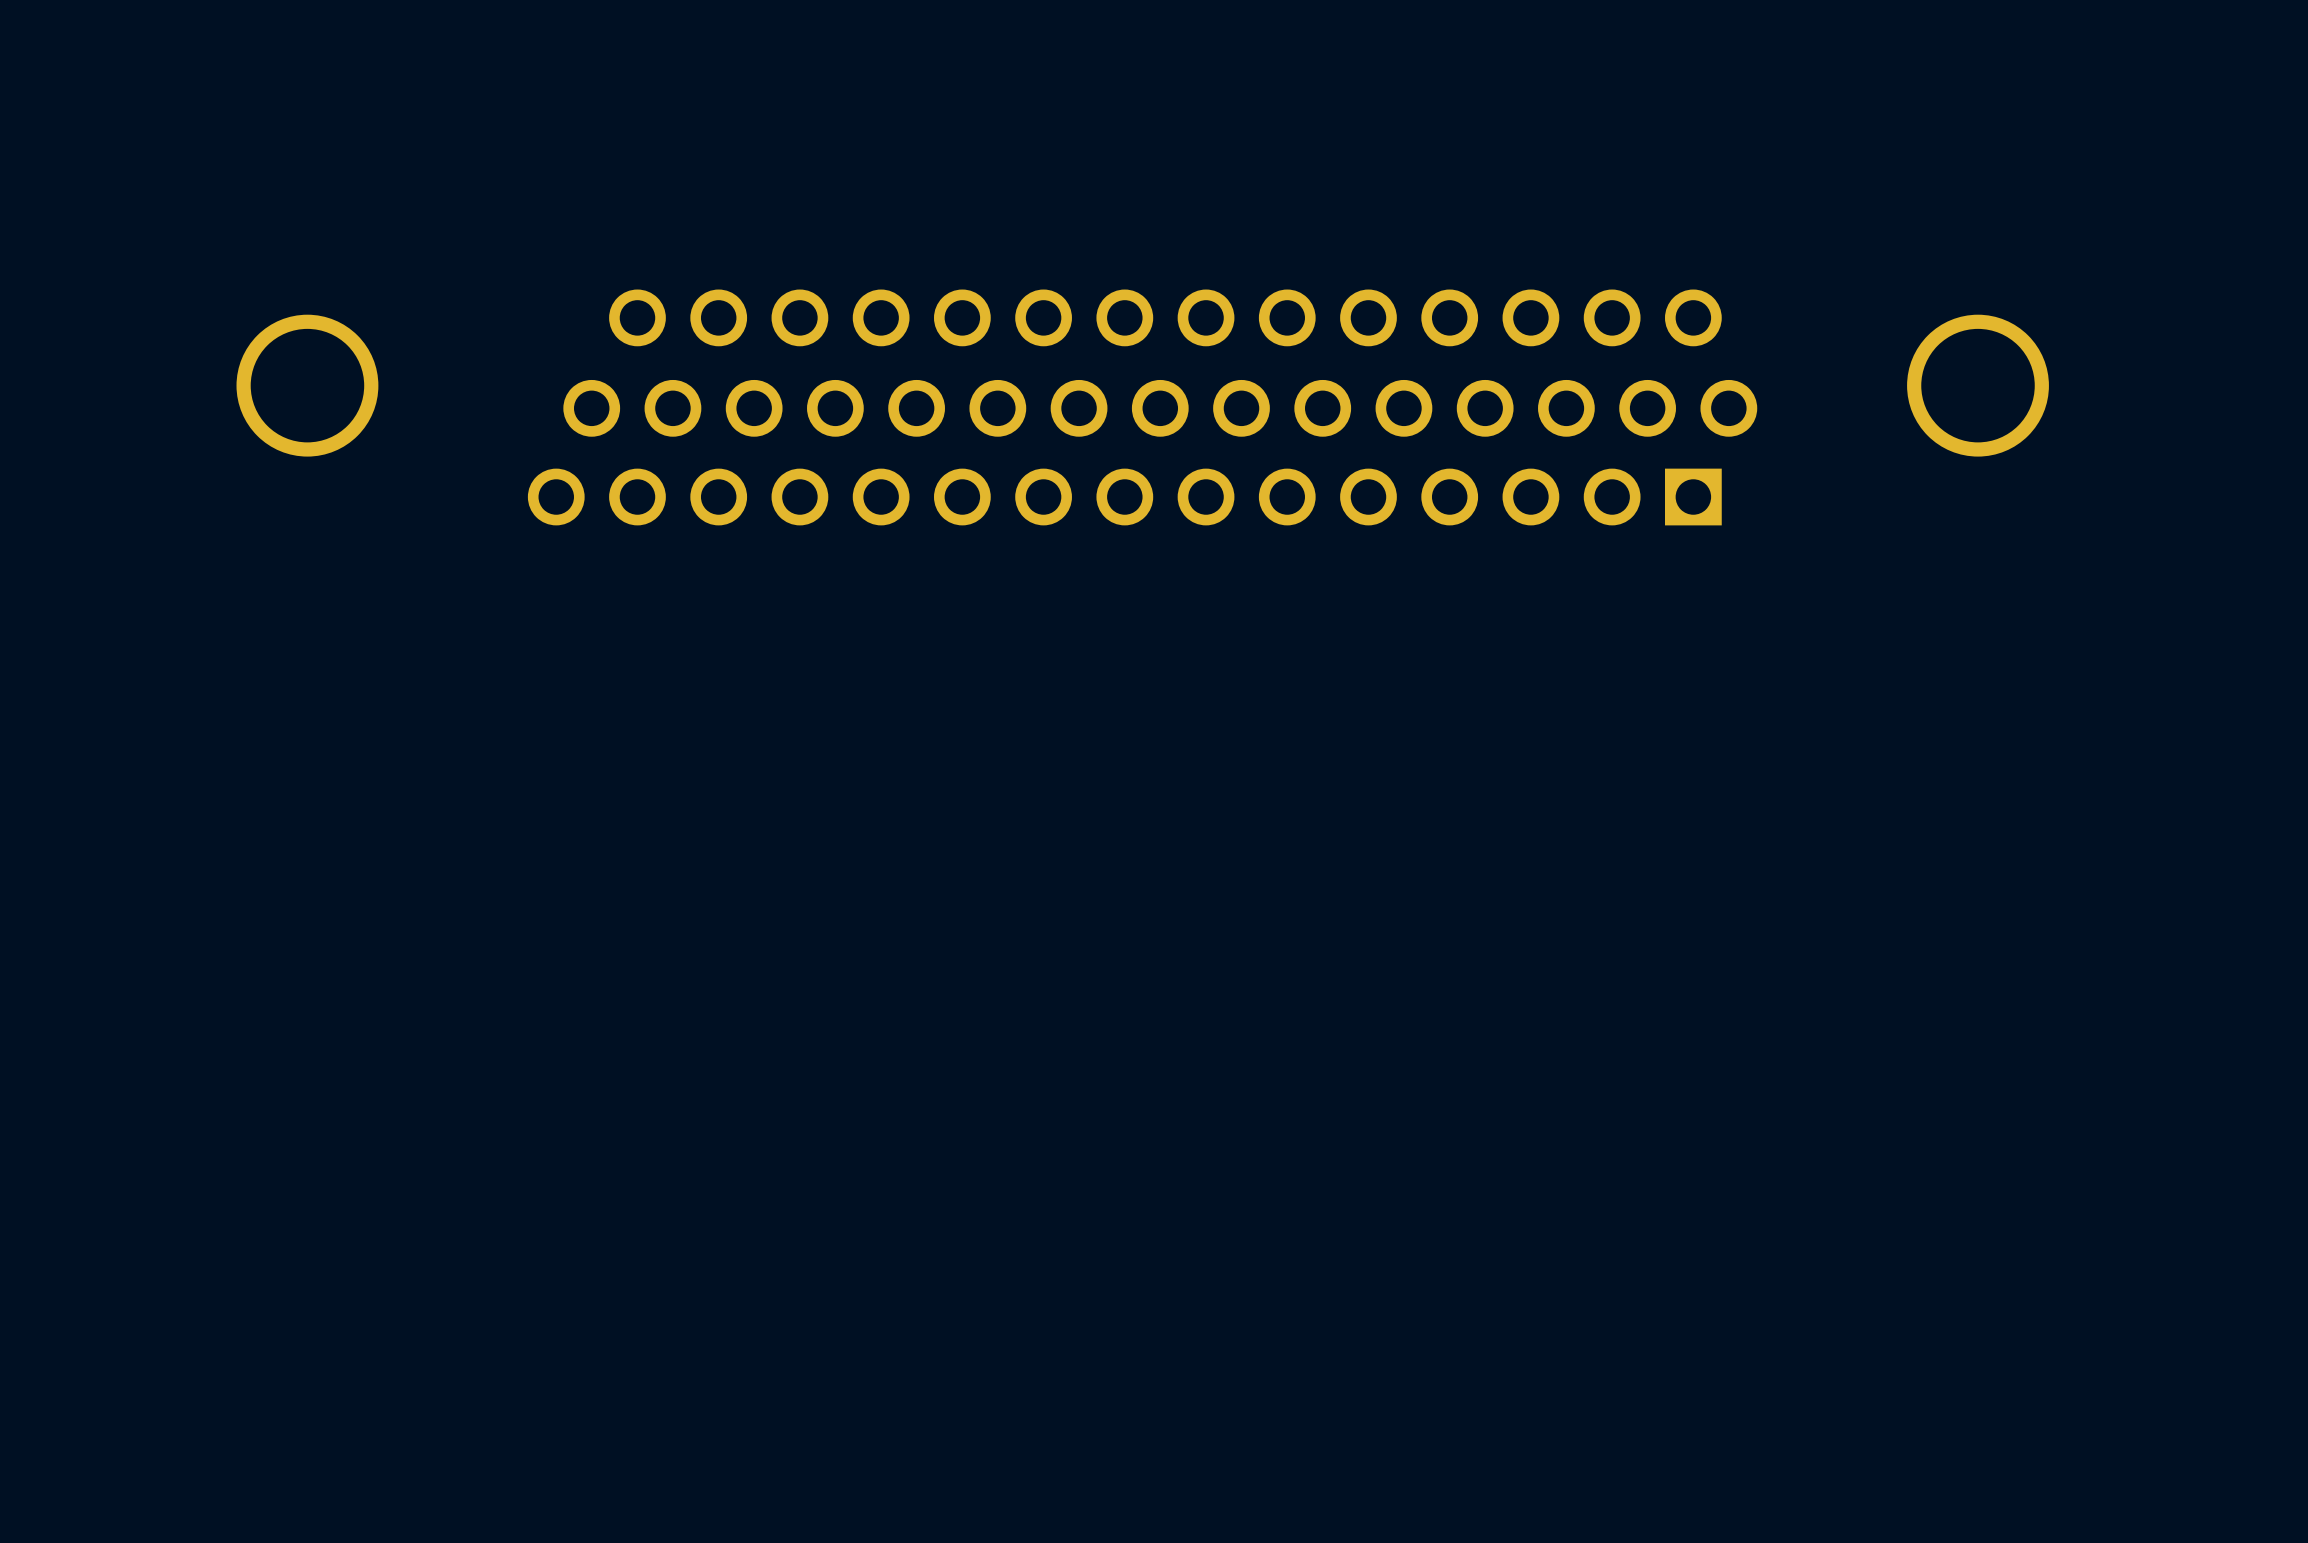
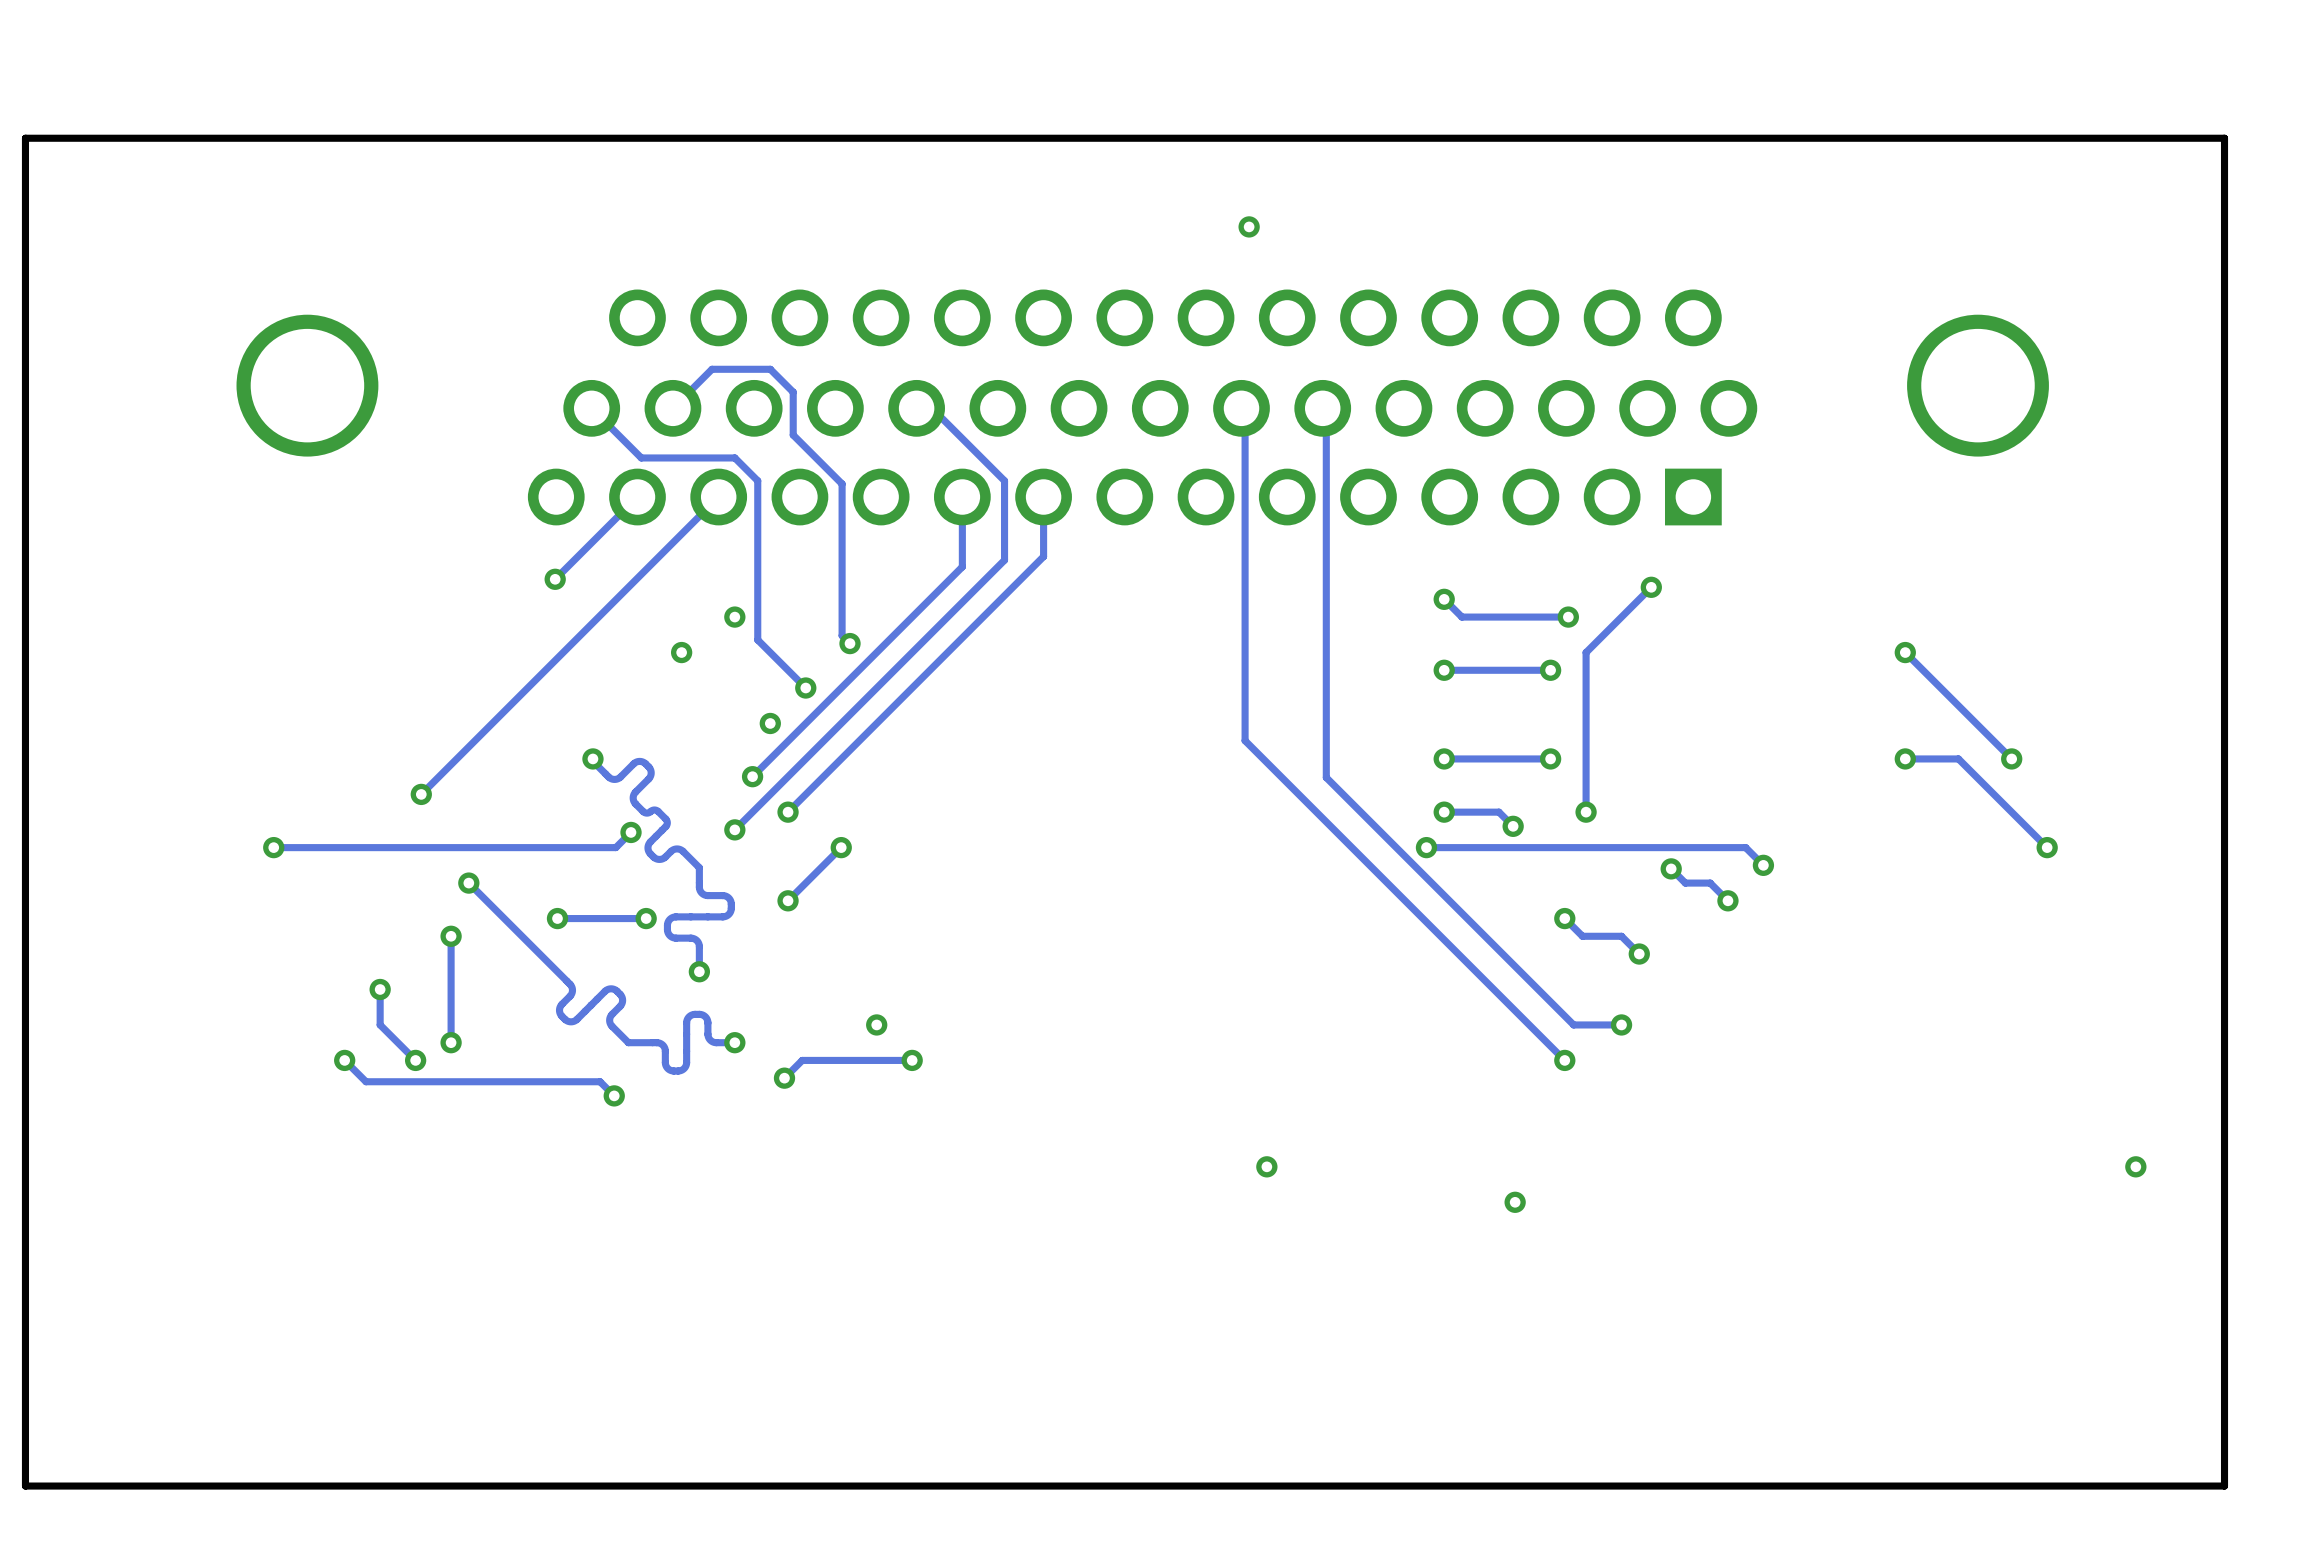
board edge: none -> (2224, 138) (25, 138) (25, 1486) (2224, 1486) (2224, 138)
via: none -> (1249, 226)
track: none -> (591, 408) (641, 457) (734, 457) (757, 480) (757, 639) (805, 688)
track: none -> (672, 408) (712, 369) (770, 369) (793, 392) (793, 435) (842, 483) (842, 635) (850, 643)
track: none -> (916, 408) (932, 408) (1004, 480) (1004, 560) (734, 829)
track: none -> (1241, 408) (1245, 411) (1245, 740) (1564, 1060)
track: none -> (1322, 408) (1326, 411) (1326, 777) (1573, 1024) (1621, 1024)
track: none -> (637, 497) (555, 579)
track: none -> (718, 497) (421, 794)
track: none -> (962, 497) (962, 566) (752, 776)
track: none -> (1043, 497) (1043, 556) (788, 812)
via: none -> (555, 579)
track: none -> (1651, 587) (1586, 652) (1586, 812)
via: none -> (1651, 587)
track: none -> (1444, 599) (1461, 617) (1568, 617)
via: none -> (1444, 599)
via: none -> (734, 617)
via: none -> (1568, 617)
via: none -> (850, 643)
via: none -> (681, 652)
track: none -> (1905, 652) (2011, 758)
via: none -> (1905, 652)
via: none -> (1444, 670)
track: none -> (1550, 670) (1444, 670)
via: none -> (1550, 670)
via: none -> (805, 688)
via: none -> (770, 723)
track: none -> (592, 758) (592, 761) (608, 776) (613, 779) (619, 777) (636, 762) (642, 762) (648, 766) (650, 776) (634, 792) (633, 800) (644, 812) (657, 810) (667, 822) (649, 843) (649, 852) (655, 858) (660, 859) (673, 849) (681, 850) (699, 867) (699, 888) (701, 893) (706, 895) (724, 895) (730, 900) (730, 911) (725, 916) (675, 916) (668, 921) (667, 931) (671, 936) (692, 938) (698, 942) (699, 971)
via: none -> (592, 758)
via: none -> (1444, 758)
track: none -> (1550, 758) (1444, 758)
via: none -> (1550, 758)
track: none -> (1905, 758) (1958, 758) (2047, 847)
via: none -> (1905, 758)
via: none -> (2011, 758)
via: none -> (752, 776)
via: none -> (421, 794)
via: none -> (788, 812)
track: none -> (1444, 812) (1498, 812) (1513, 826)
via: none -> (1444, 812)
via: none -> (1586, 812)
via: none -> (1513, 826)
via: none -> (734, 829)
track: none -> (631, 832) (615, 847) (273, 847)
via: none -> (631, 832)
via: none -> (273, 847)
track: none -> (841, 847) (788, 900)
via: none -> (841, 847)
track: none -> (1426, 847) (1745, 847) (1763, 865)
via: none -> (1426, 847)
via: none -> (2047, 847)
via: none -> (1763, 865)
track: none -> (1671, 868) (1685, 883) (1710, 883) (1727, 900)
via: none -> (1671, 868)
track: none -> (468, 883) (570, 984) (571, 993) (559, 1009) (560, 1014) (566, 1020) (576, 1020) (605, 990) (612, 988) (620, 994) (622, 1000) (620, 1005) (610, 1017) (611, 1025) (628, 1042) (656, 1042) (662, 1044) (665, 1049) (665, 1065) (670, 1070) (680, 1070) (686, 1065) (686, 1021) (691, 1015) (700, 1014) (706, 1017) (708, 1036) (711, 1041) (734, 1042)
via: none -> (468, 883)
via: none -> (788, 900)
via: none -> (1727, 900)
via: none -> (557, 918)
track: none -> (646, 918) (557, 918)
via: none -> (646, 918)
track: none -> (1564, 918) (1582, 936) (1621, 936) (1639, 954)
via: none -> (1564, 918)
track: none -> (451, 936) (451, 1042)
via: none -> (451, 936)
via: none -> (1639, 954)
via: none -> (699, 971)
track: none -> (380, 989) (380, 1024) (415, 1060)
via: none -> (380, 989)
via: none -> (876, 1024)
via: none -> (1621, 1024)
via: none -> (451, 1042)
via: none -> (734, 1042)
track: none -> (344, 1060) (366, 1081) (600, 1081) (614, 1095)
via: none -> (344, 1060)
via: none -> (415, 1060)
track: none -> (912, 1060) (802, 1060) (784, 1078)
via: none -> (912, 1060)
via: none -> (1564, 1060)
via: none -> (784, 1078)
via: none -> (614, 1095)
via: none -> (1266, 1166)
via: none -> (2135, 1166)
via: none -> (1515, 1202)

